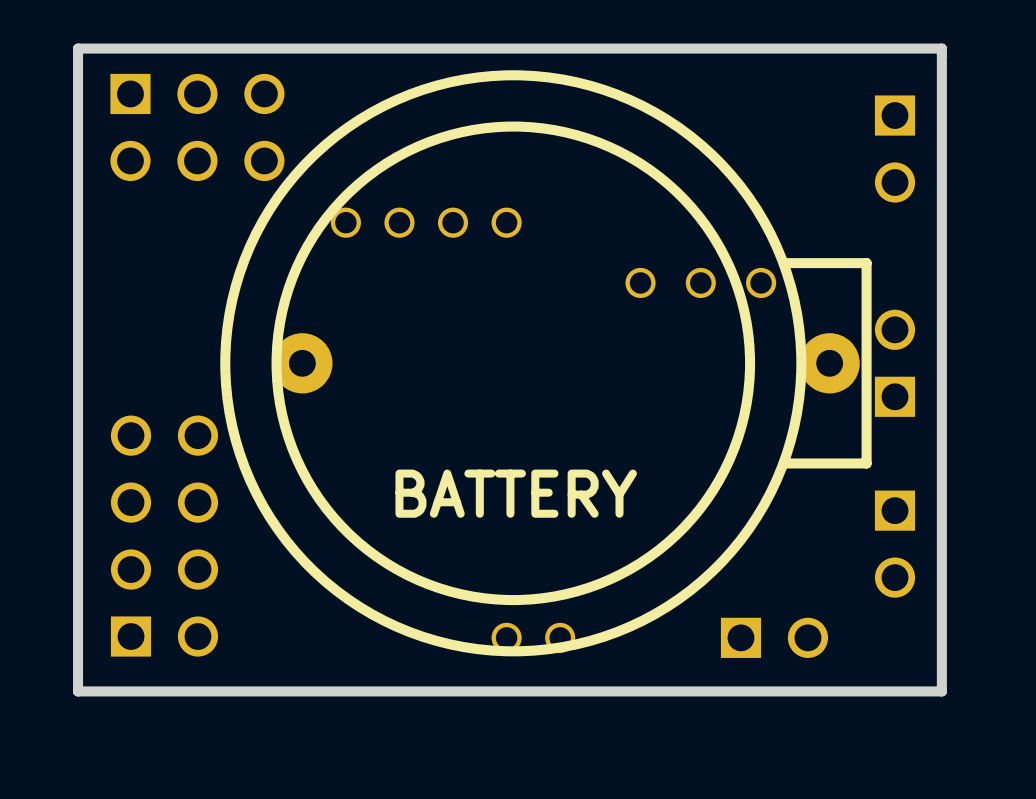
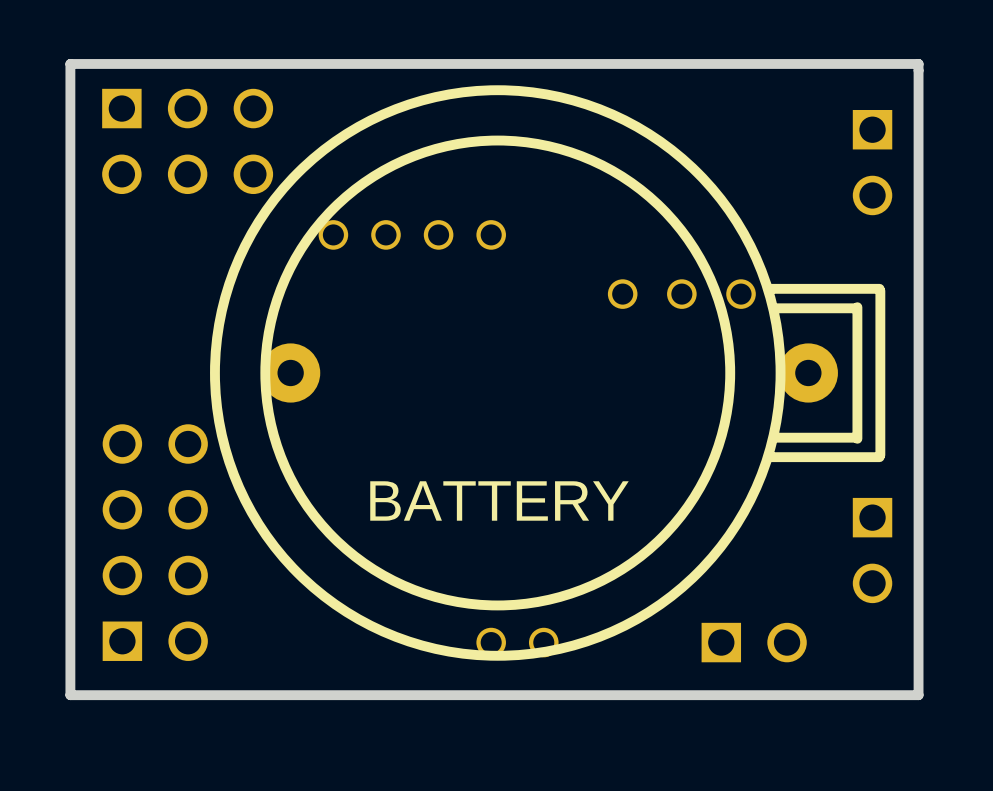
part footprint: [220, 70, 872, 657] -> [210, 85, 886, 661]
part: (895, 363) -> none

